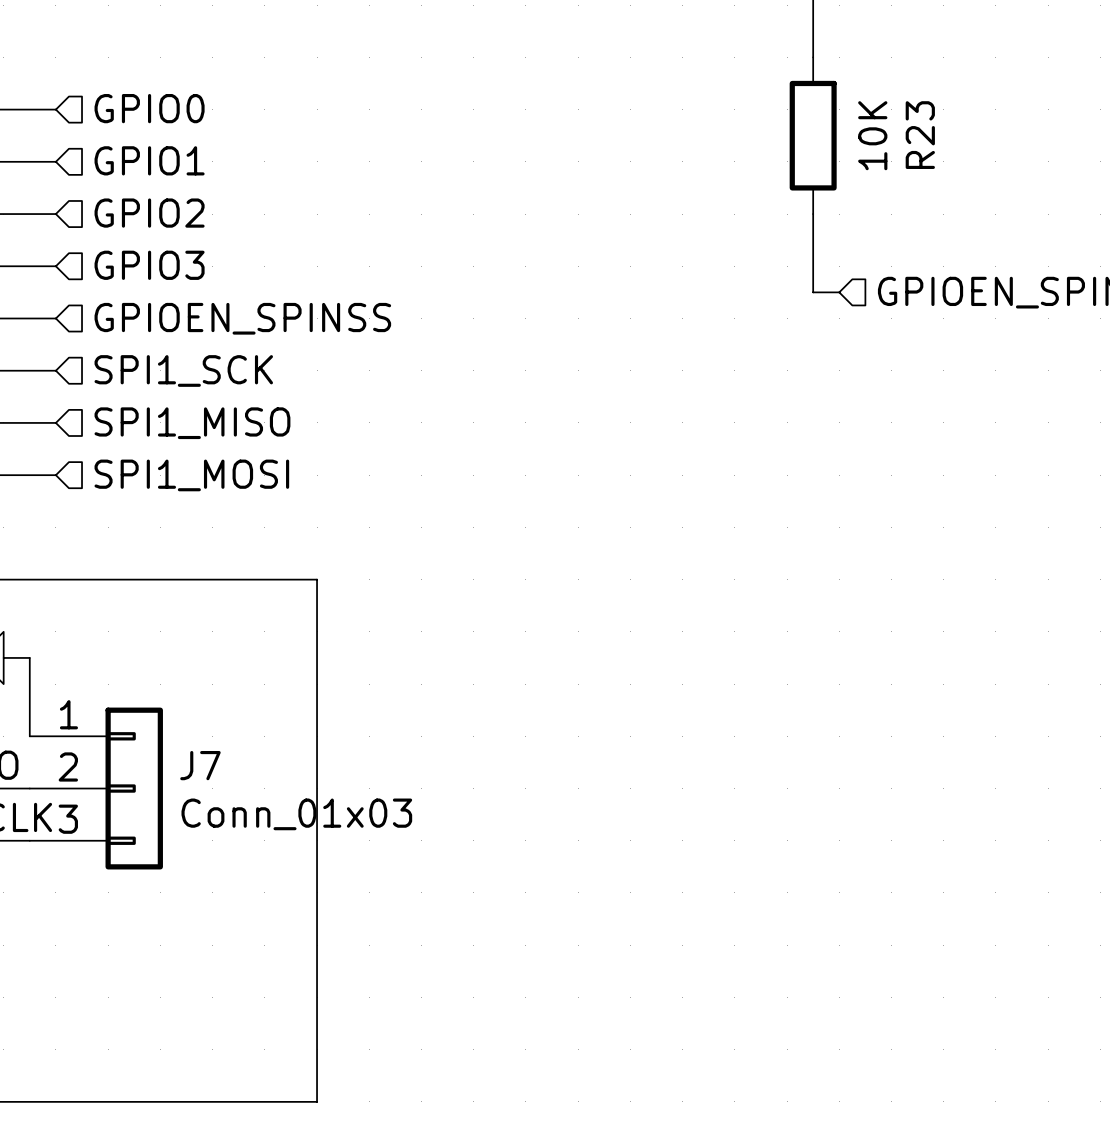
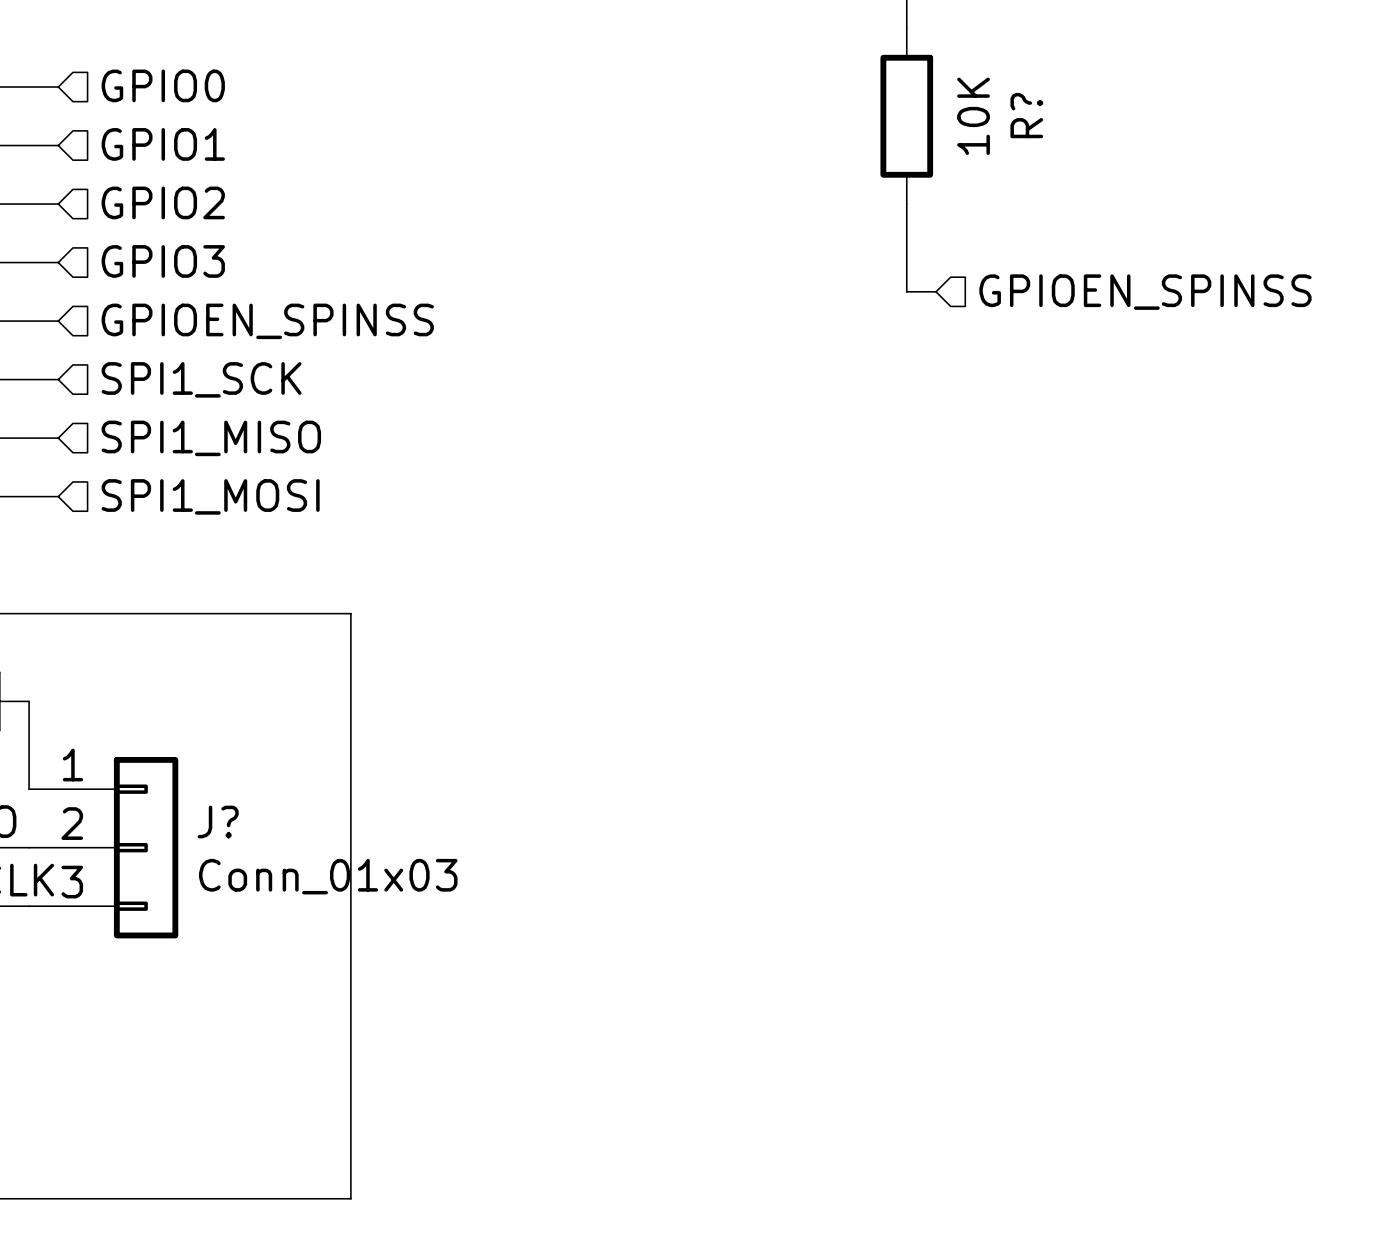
R23 name: R23 (920, 135) -> R? (1026, 115)
J7 name: J7 (200, 765) -> J? (218, 822)

